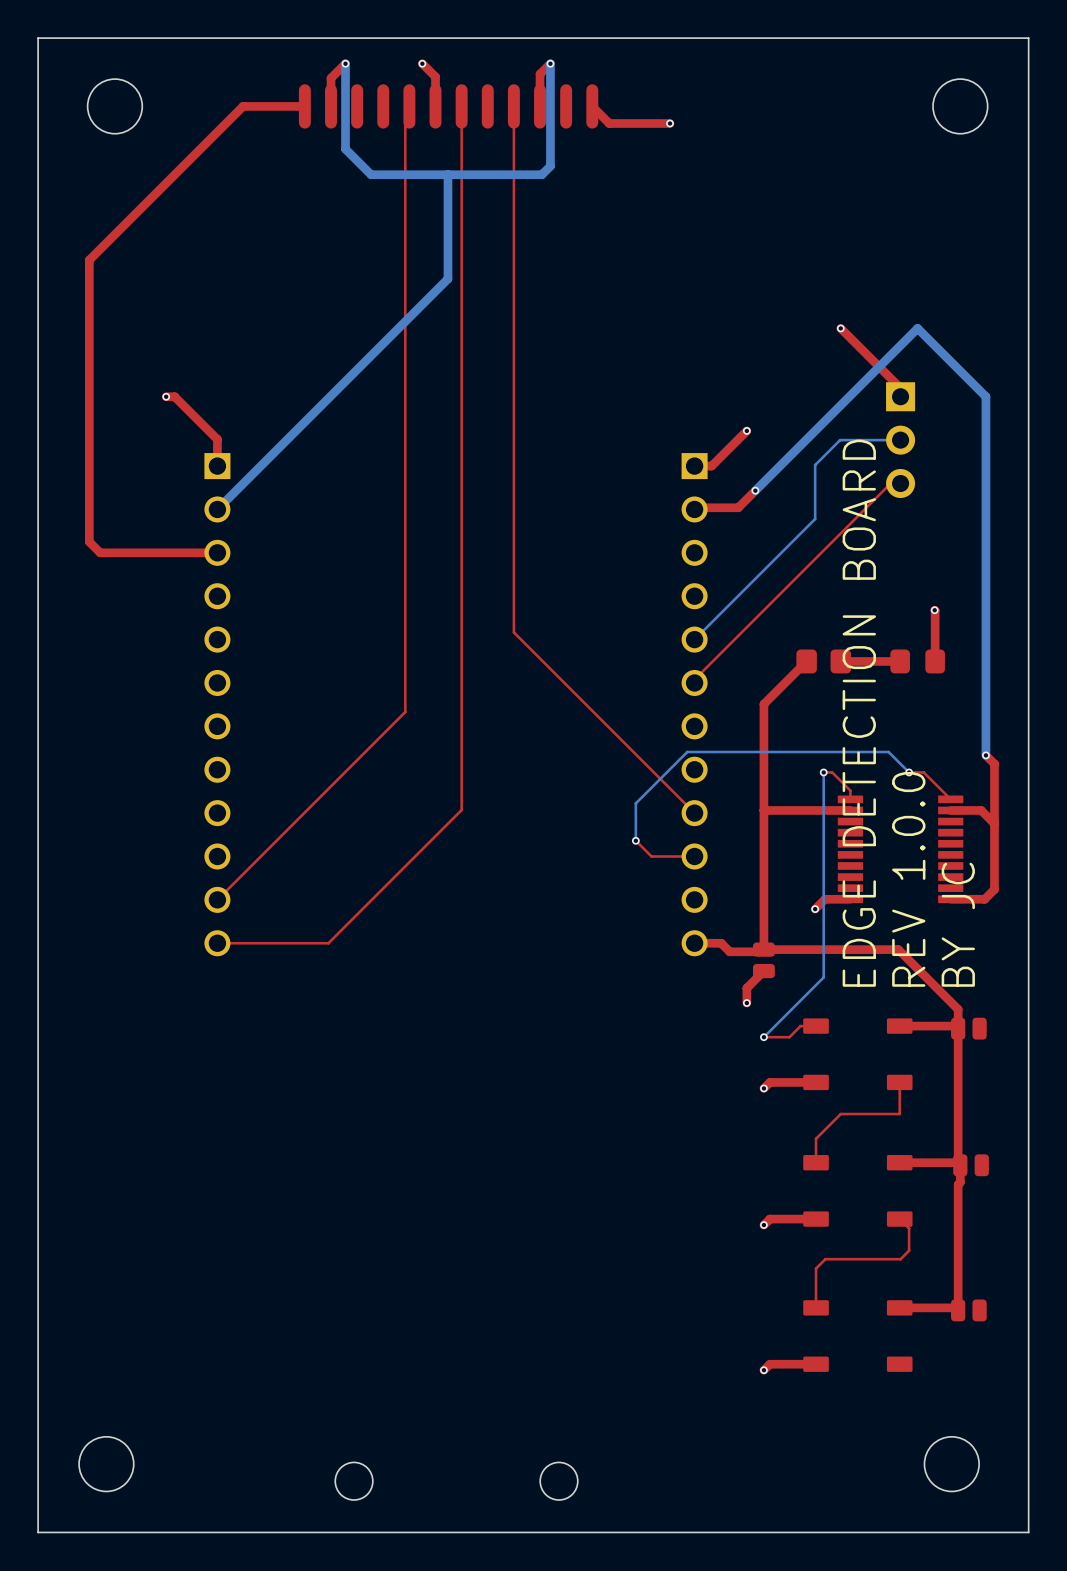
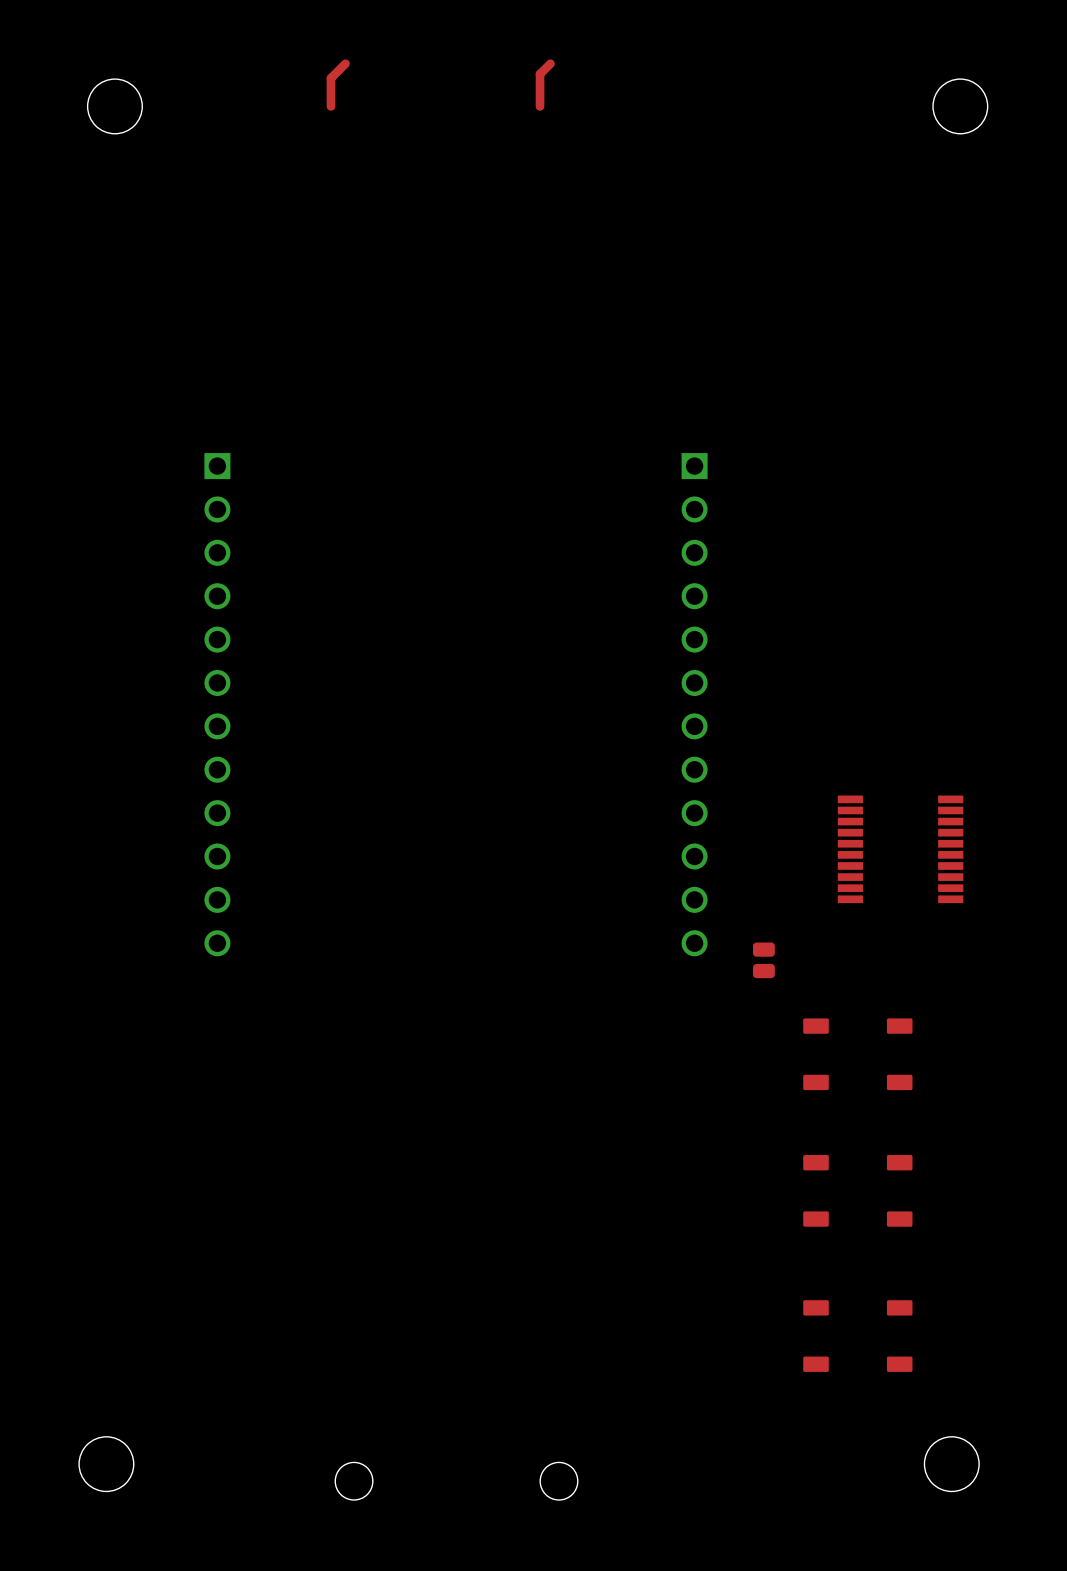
board edge: (1028, 38) (38, 38) (38, 1532) (1028, 1532) (1028, 38) -> none
via: (345, 63) -> none
top track: (422, 63) (435, 76) (435, 106) -> none
via: (422, 63) -> none
bottom track: (550, 63) (550, 166) (541, 174) (371, 174) (345, 149) (345, 63) -> none
via: (550, 63) -> none
top track: (304, 106) (243, 106) (89, 260) (89, 541) (100, 552) (217, 552) -> none
top track: (409, 106) (405, 110) (405, 712) (217, 899) -> none
part: (448, 106) -> none
top track: (461, 106) (461, 810) (328, 943) (217, 943) -> none
top track: (513, 106) (513, 632) (694, 813) -> none
top track: (592, 106) (609, 123) (670, 123) -> none
via: (670, 123) -> none
bottom track: (447, 174) (447, 278) (217, 509) -> none
top track: (840, 328) (900, 388) (900, 396) -> none
via: (840, 328) -> none
top track: (166, 396) (174, 396) (217, 439) (217, 466) -> none
via: (166, 396) -> none
top track: (746, 430) (711, 466) (694, 466) -> none
via: (746, 430) -> none
bottom track: (900, 440) (840, 440) (815, 465) (815, 519) (694, 639) -> none
part: (900, 440) -> none
top track: (900, 483) (890, 483) (694, 679) -> none
top track: (755, 490) (738, 507) (696, 507) (694, 509) -> none
bottom track: (755, 490) (917, 328) (985, 396) (985, 755) -> none
via: (755, 490) -> none
top track: (934, 610) (935, 661) -> none
via: (934, 610) -> none
top track: (806, 661) (763, 704) (763, 949) -> none
part: (823, 661) -> none
top track: (900, 661) (840, 661) -> none
part: (917, 661) -> none
text: EDGE DETECTION BOARD (859, 713) -> none
top track: (985, 755) (994, 763) (994, 889) (984, 899) (950, 899) -> none
via: (985, 755) -> none
top track: (823, 772) (832, 772) (850, 790) (850, 799) -> none
bottom track: (823, 772) (823, 977) (763, 1037) -> none
via: (823, 772) -> none
top track: (909, 772) (923, 772) (950, 799) -> none
bottom track: (909, 772) (888, 752) (687, 752) (635, 803) (635, 840) -> none
via: (909, 772) -> none
top track: (850, 810) (763, 810) -> none
top track: (950, 810) (981, 810) (994, 823) -> none
top track: (635, 840) (651, 856) (694, 856) -> none
via: (635, 840) -> none
text: REV 1.0.0 (908, 879) -> none
top track: (850, 899) (824, 899) (815, 909) -> none
via: (815, 909) -> none
text: BY JC (958, 924) -> none
top track: (694, 943) (721, 943) (729, 951) (761, 951) (763, 949) -> none
top track: (763, 949) (898, 949) (958, 1009) (958, 1163) -> none
top track: (763, 971) (746, 988) (746, 1003) -> none
via: (746, 1003) -> none
top track: (816, 1026) (800, 1026) (789, 1037) (763, 1037) -> none
top track: (899, 1026) (955, 1026) (958, 1028) -> none
part: (968, 1028) -> none
via: (763, 1037) -> none
top track: (816, 1082) (769, 1082) (763, 1088) -> none
top track: (899, 1082) (899, 1114) (840, 1114) (816, 1138) (816, 1162) -> none
via: (763, 1088) -> none
top track: (899, 1162) (957, 1162) (960, 1165) (960, 1182) (958, 1184) (958, 1310) (955, 1307) (899, 1307) -> none
part: (971, 1165) -> none
top track: (816, 1219) (769, 1219) (763, 1225) -> none
top track: (899, 1219) (909, 1228) (909, 1250) (900, 1259) (825, 1259) (816, 1268) (816, 1307) -> none
via: (763, 1225) -> none
part: (968, 1310) -> none
top track: (816, 1364) (769, 1364) (763, 1370) -> none
via: (763, 1370) -> none

